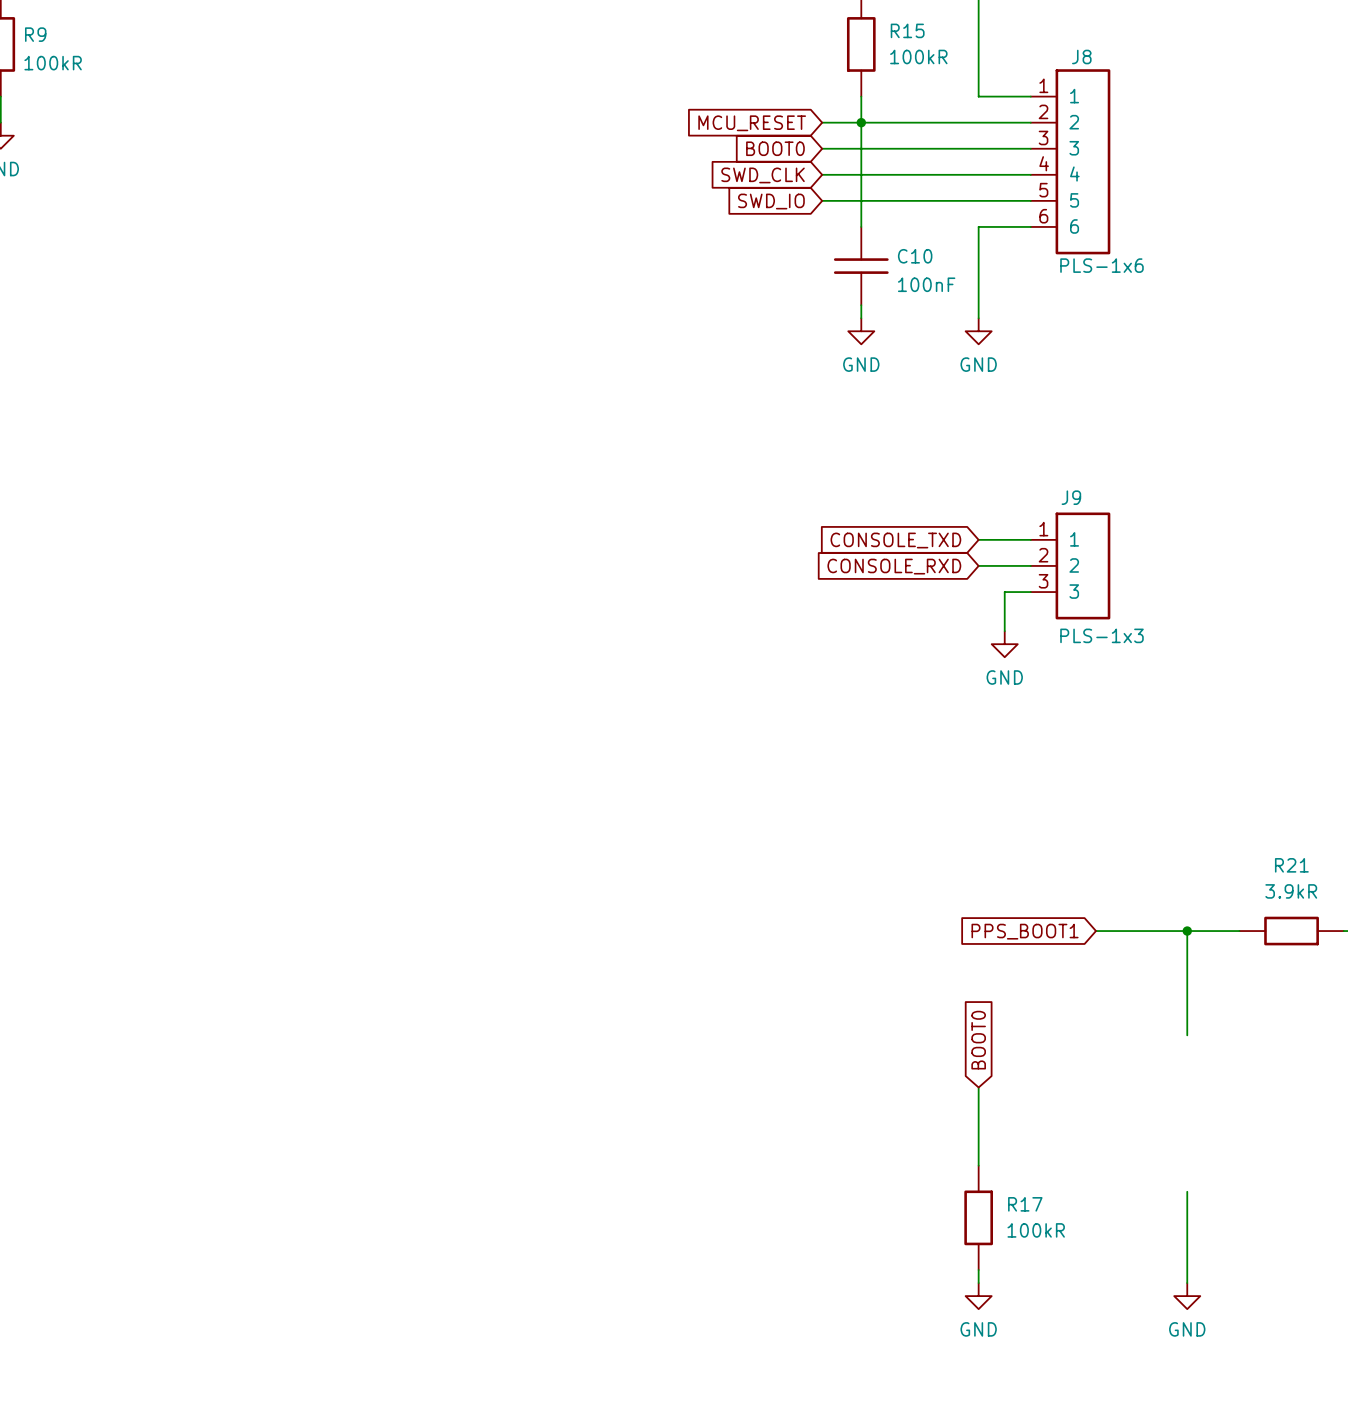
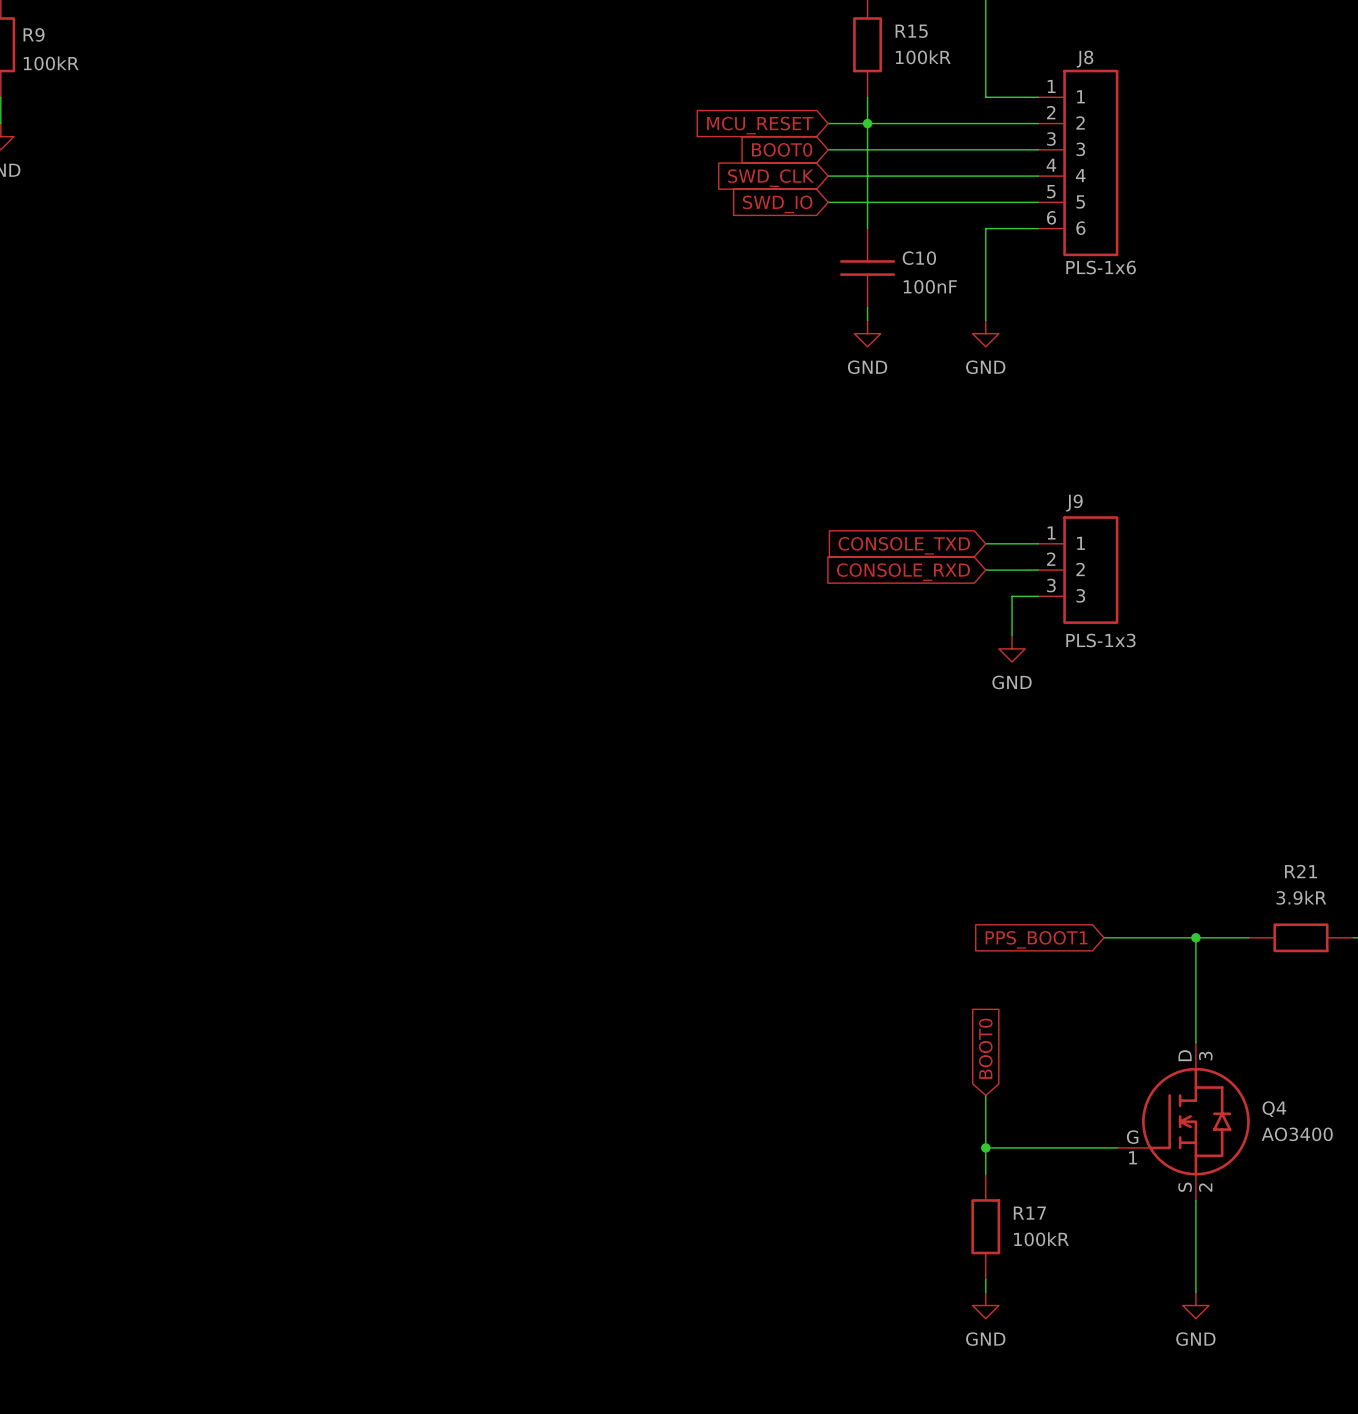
Q4: none -> AO3400 (1183, 1121)
wire: none -> (985, 1147) (1117, 1147)
junction: none -> (985, 1147)

